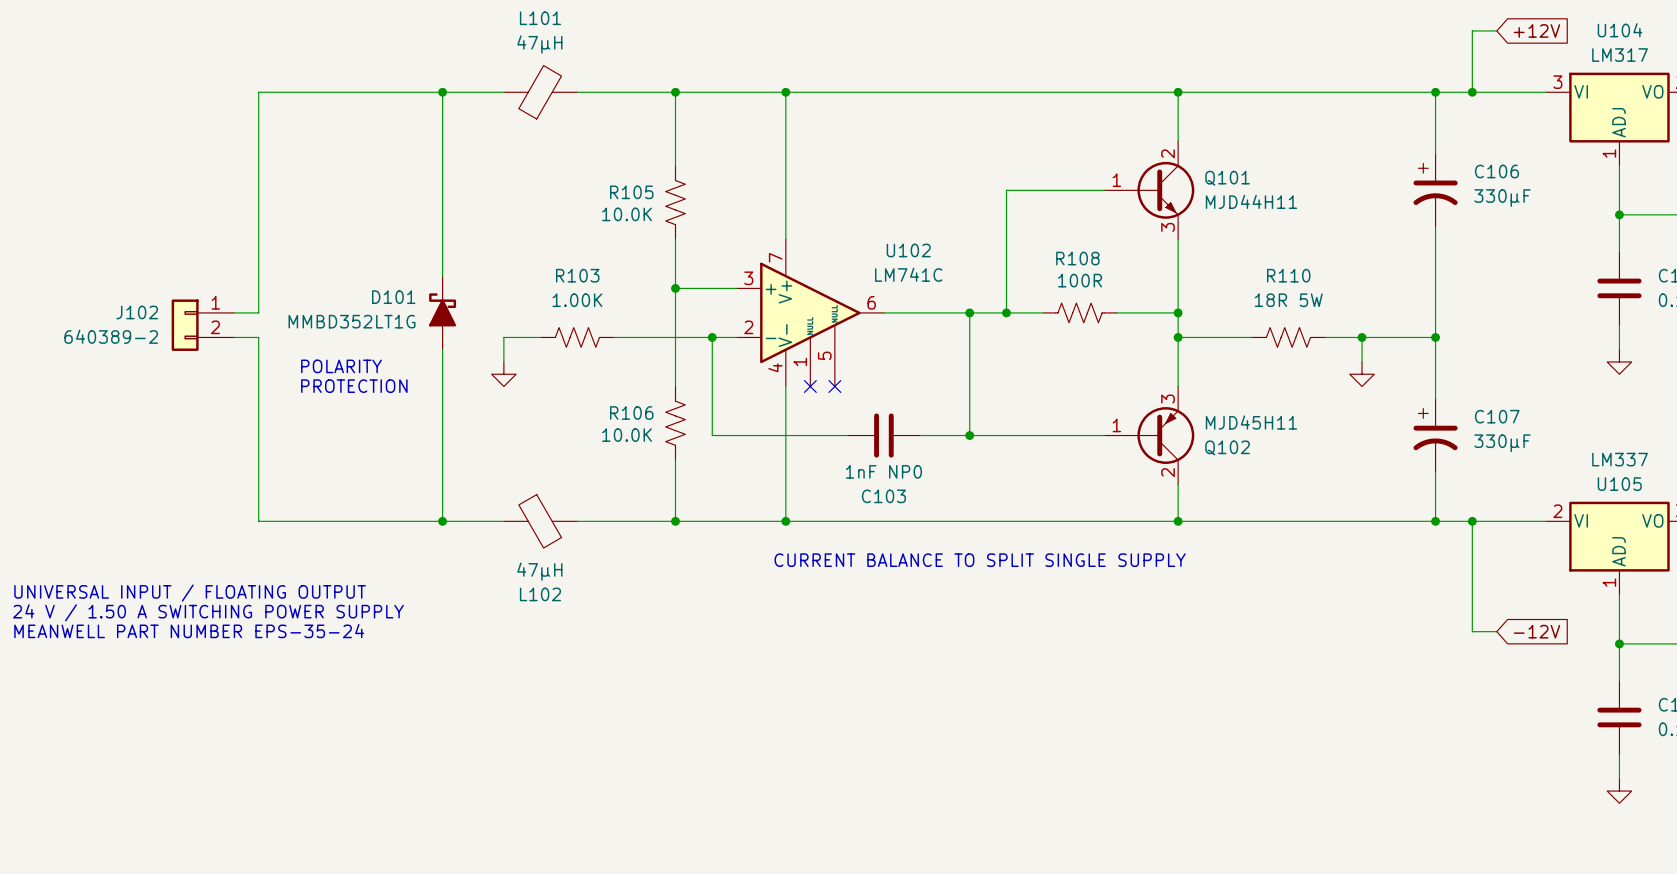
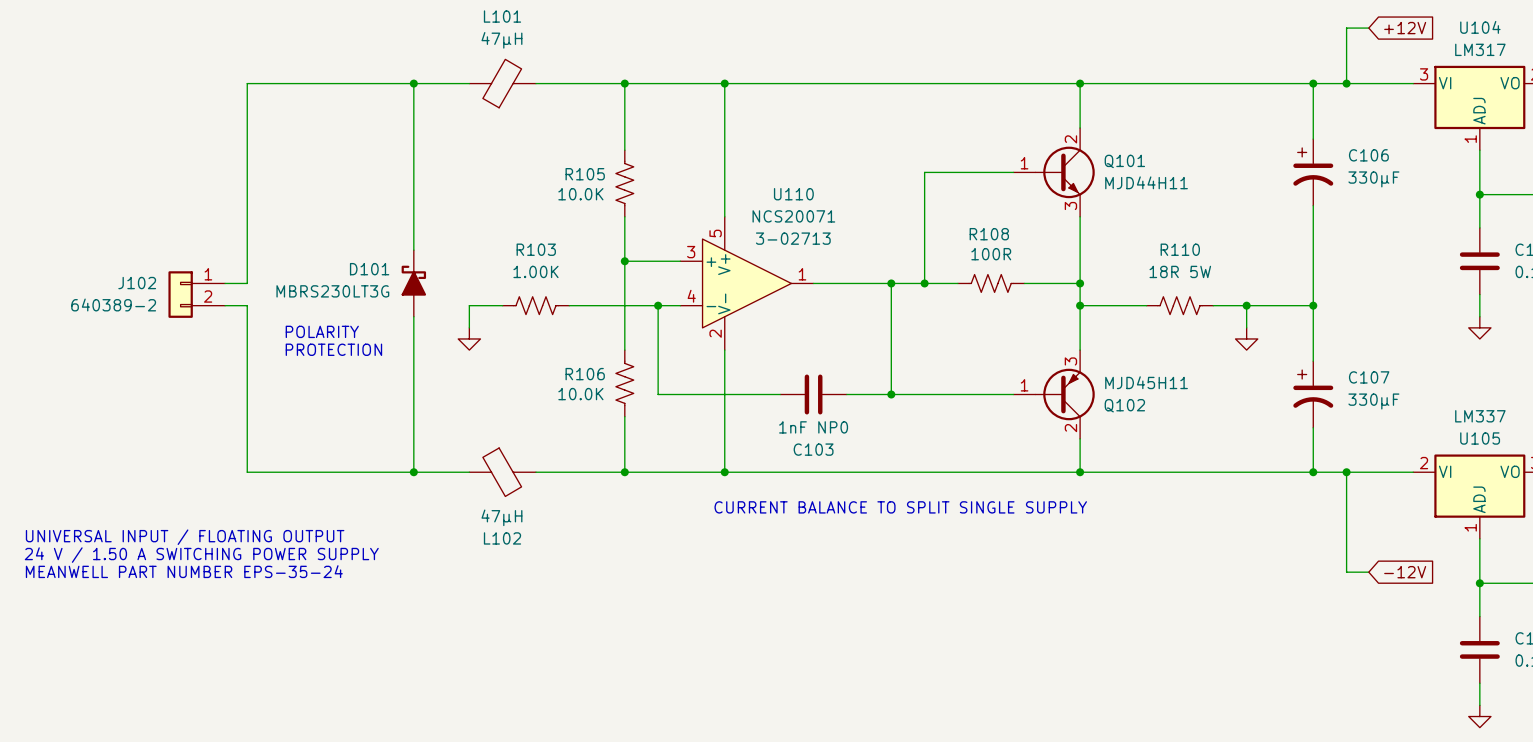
U102: LM741C (810, 312) -> none
U110: none -> NCS20071 (746, 283)
D101 value: MMBD352LT1G (352, 321) -> MBRS230LT3G (332, 291)
no-connect mark: (810, 386) -> none
no-connect mark: (834, 386) -> none

